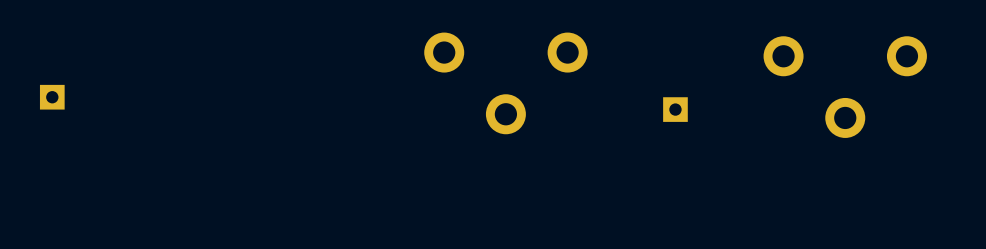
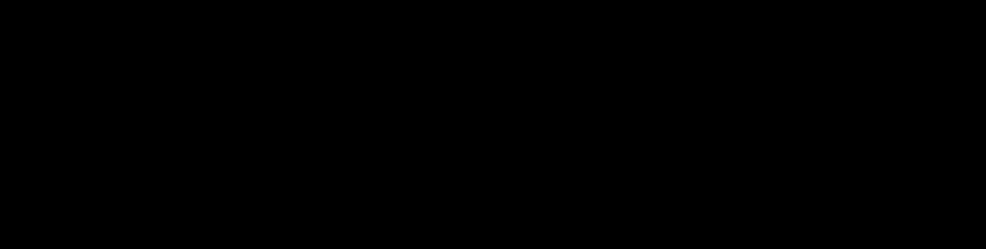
part: (505, 83) -> none
part: (845, 87) -> none
part: (52, 97) -> none
part: (675, 109) -> none

